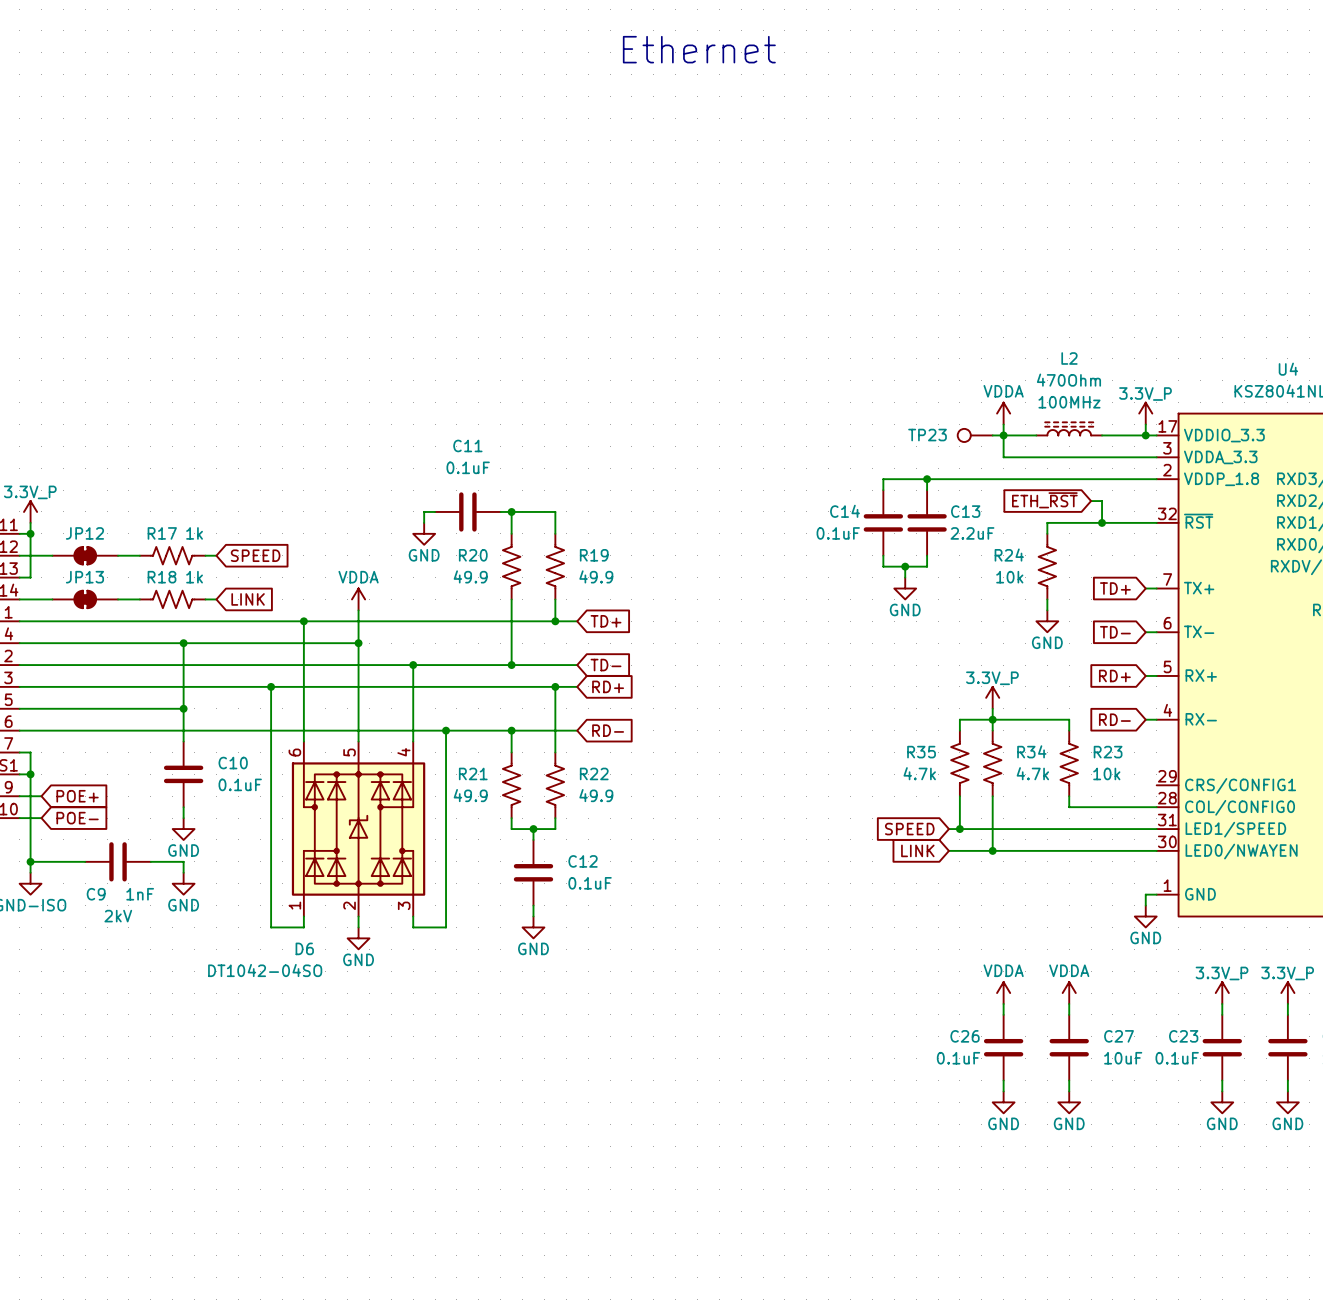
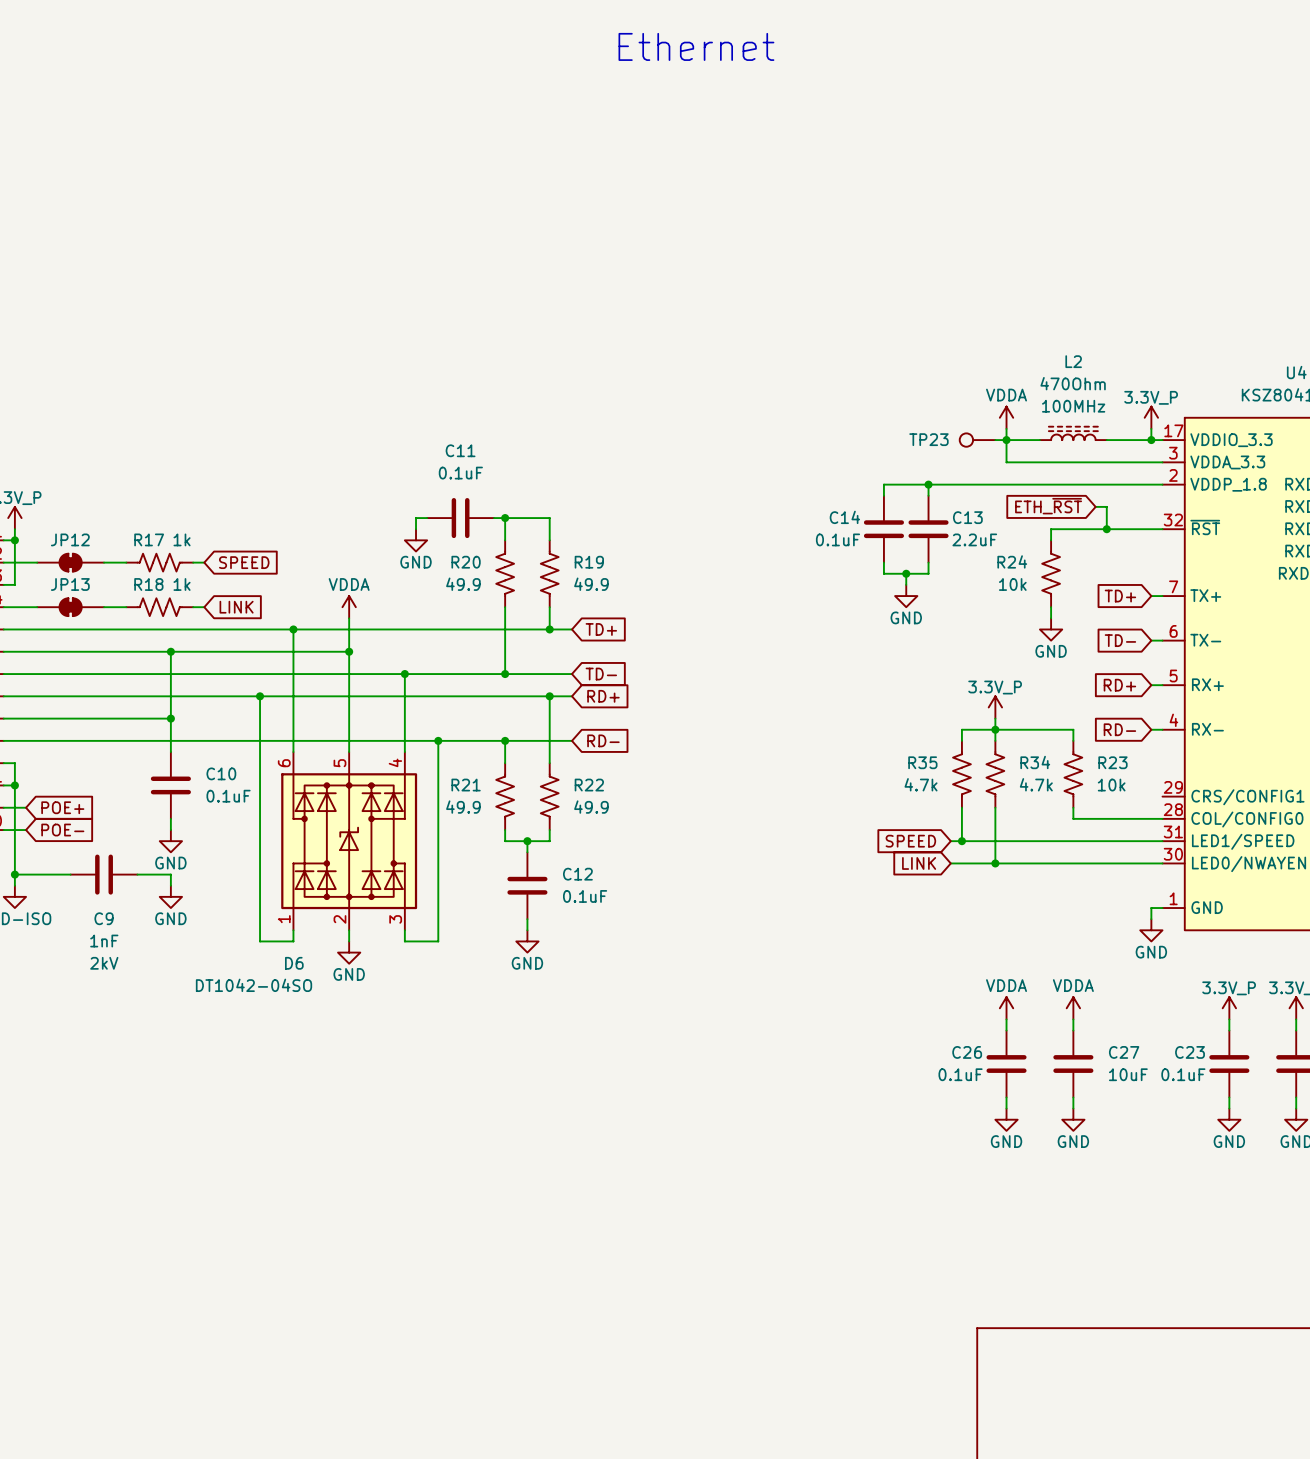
C9 name position: C9 (96, 894) -> C9 (104, 918)
C9 value position: 1nF (140, 894) -> 1nF (104, 941)
C9 text position: 2kV (118, 916) -> 2kV (104, 963)

